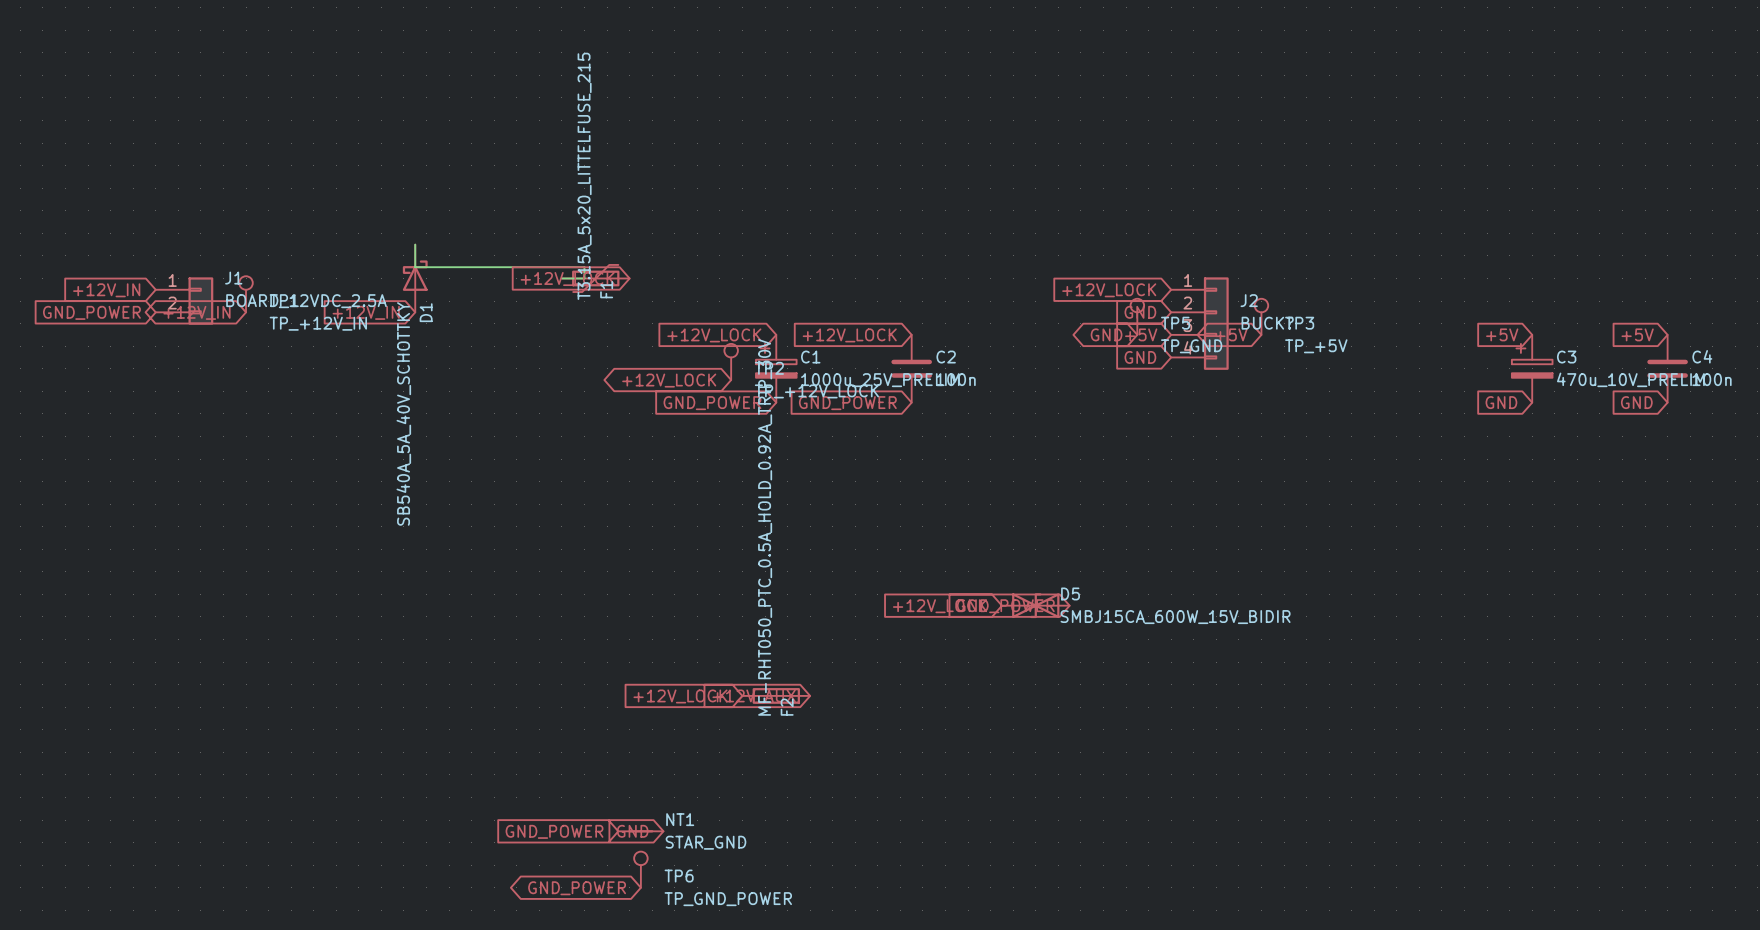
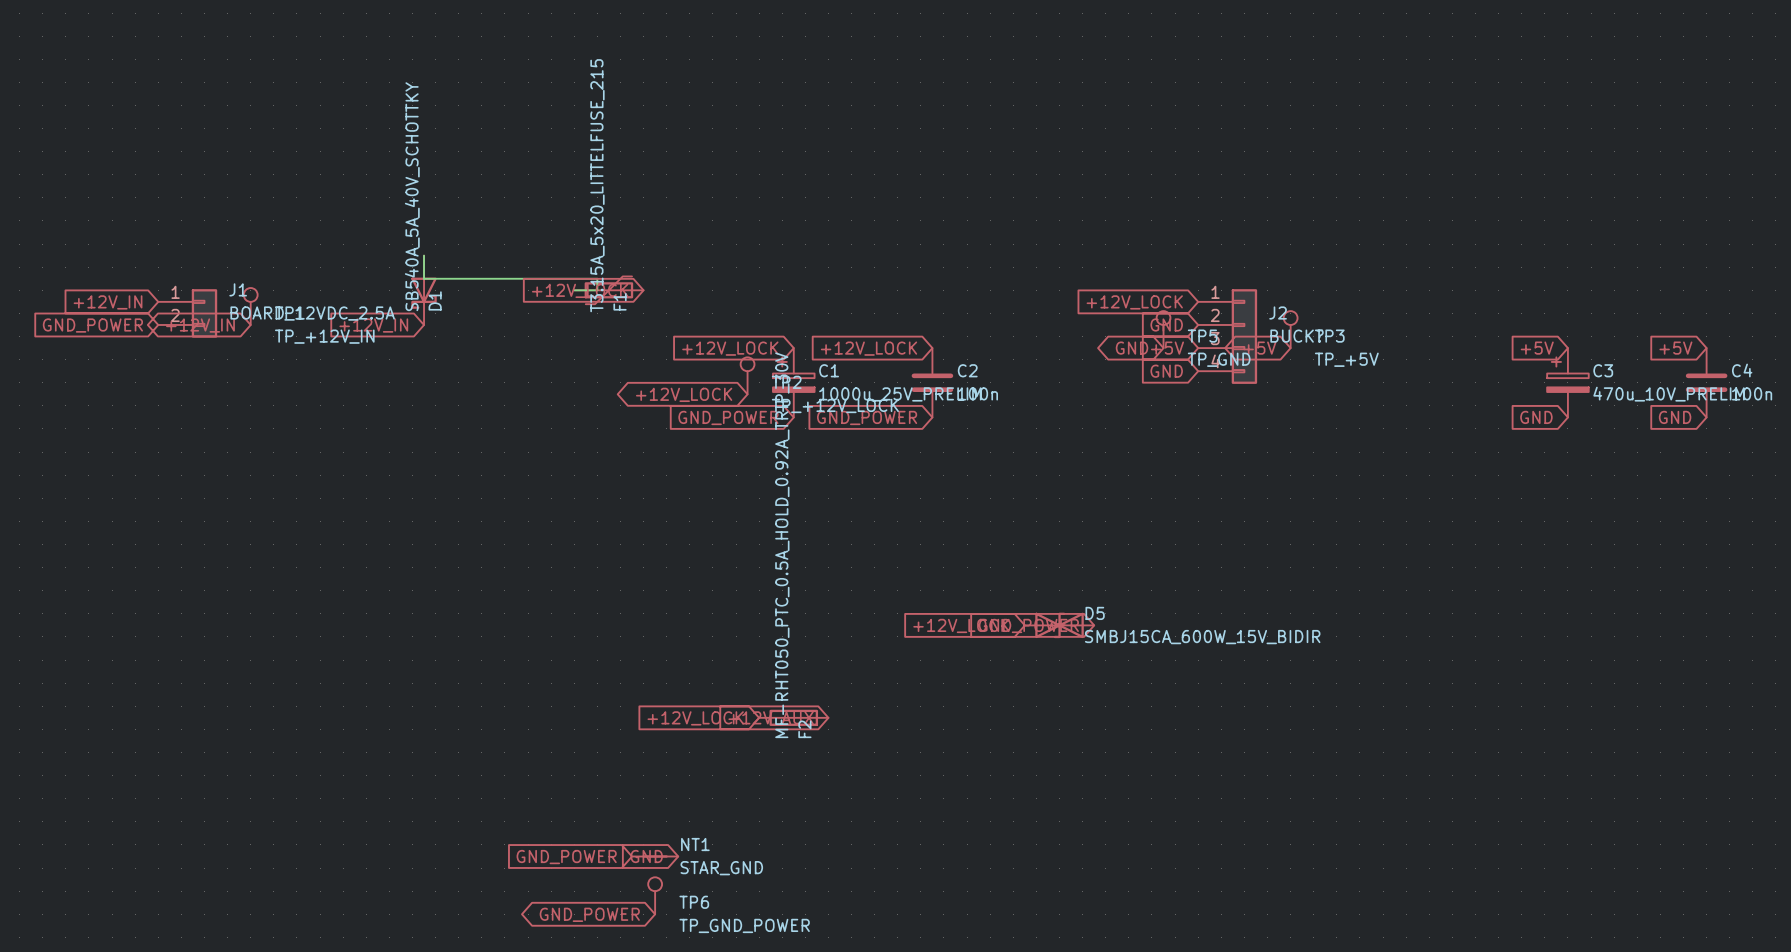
D1 rotation: 0° (415, 275) -> 180° (424, 293)
D1 name position: D1 (426, 312) -> D1 (435, 300)
D1 value position: SB540A_5A_40V_SCHOTTKY (403, 413) -> SB540A_5A_40V_SCHOTTKY (412, 196)

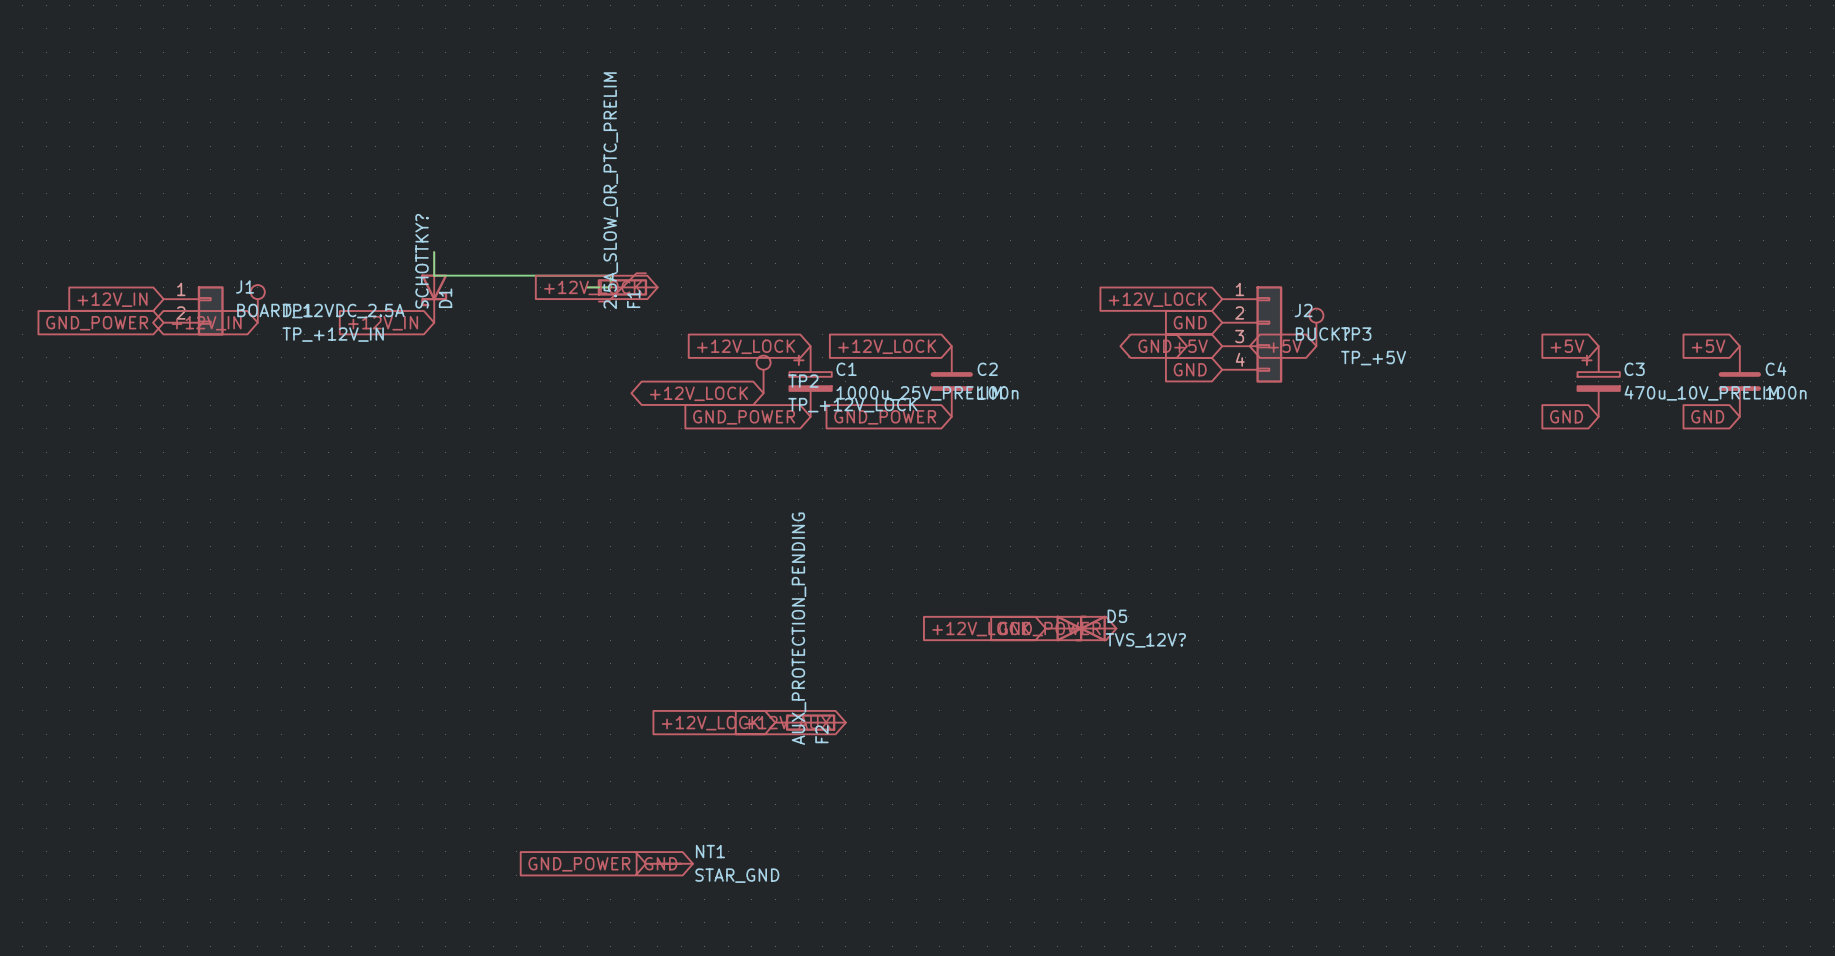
F1 value: T3.15A_5x20_LITTELFUSE_215 (597, 185) -> 2.5A_SLOW_OR_PTC_PRELIM (610, 190)
D1 value: SB540A_5A_40V_SCHOTTKY (412, 196) -> SCHOTTKY? (422, 261)
TP5: TP_GND (1163, 329) -> none
F2 value: MF-RHT050_PTC_0.5A_HOLD_0.92A_TRIP_30V (782, 545) -> AUX_PROTECTION_PENDING (798, 628)
D5 value: SMBJ15CA_600W_15V_BIDIR (1202, 637) -> TVS_12V? (1145, 640)
TP6: TP_GND_POWER (655, 895) -> none
global label: GND_POWER (589, 914) -> none

